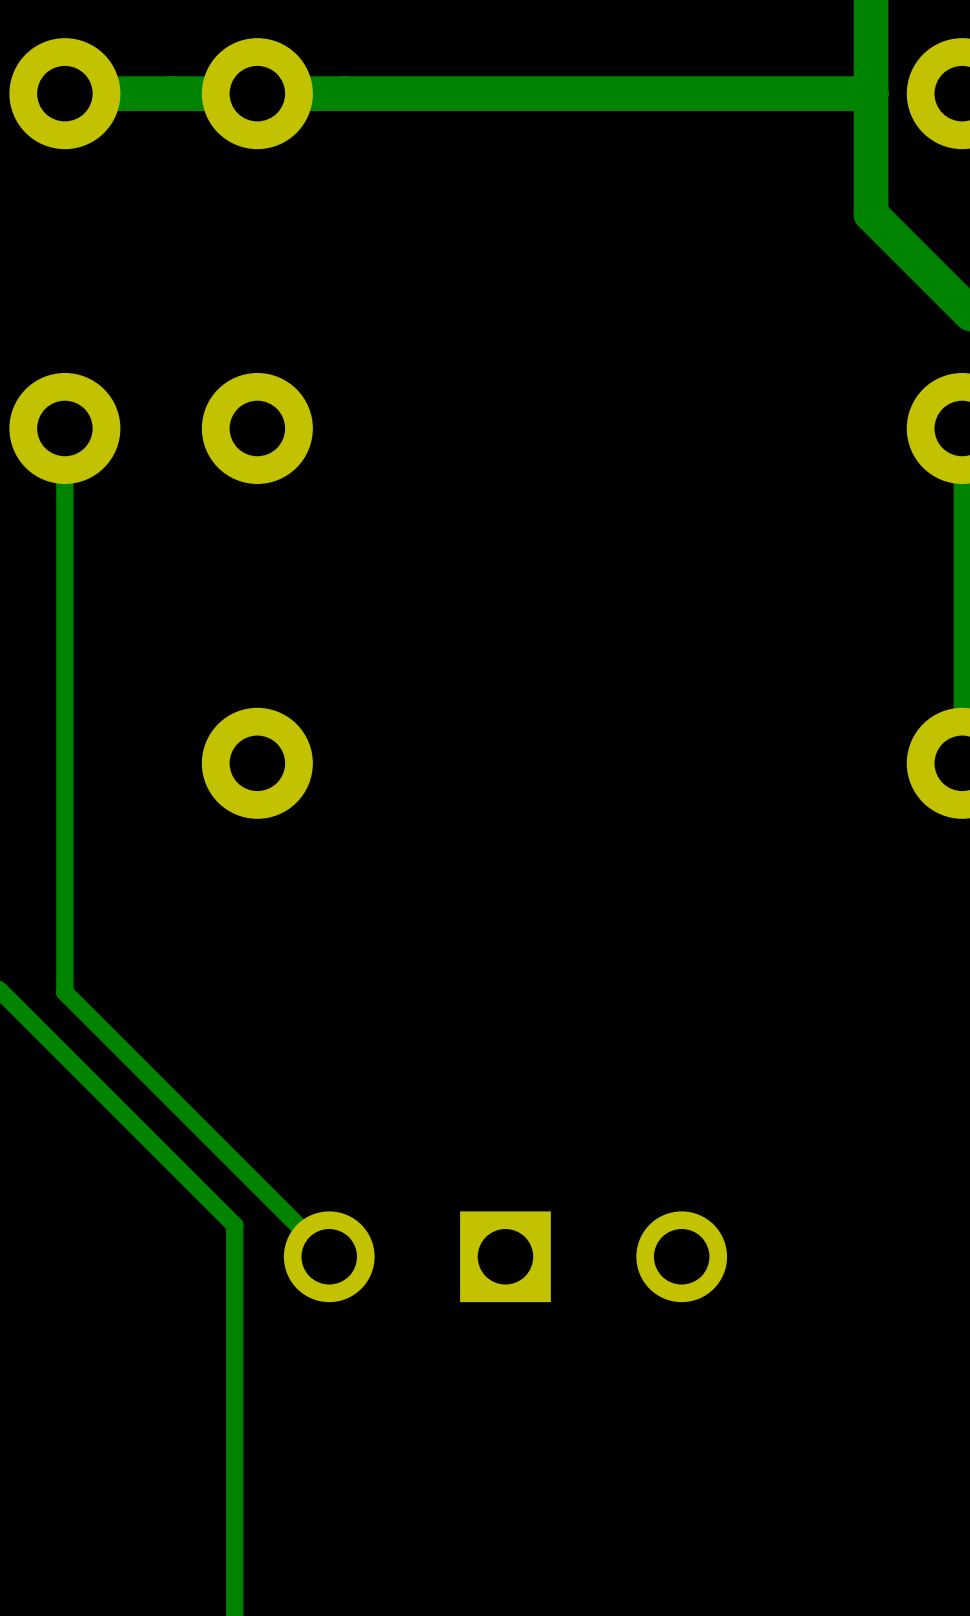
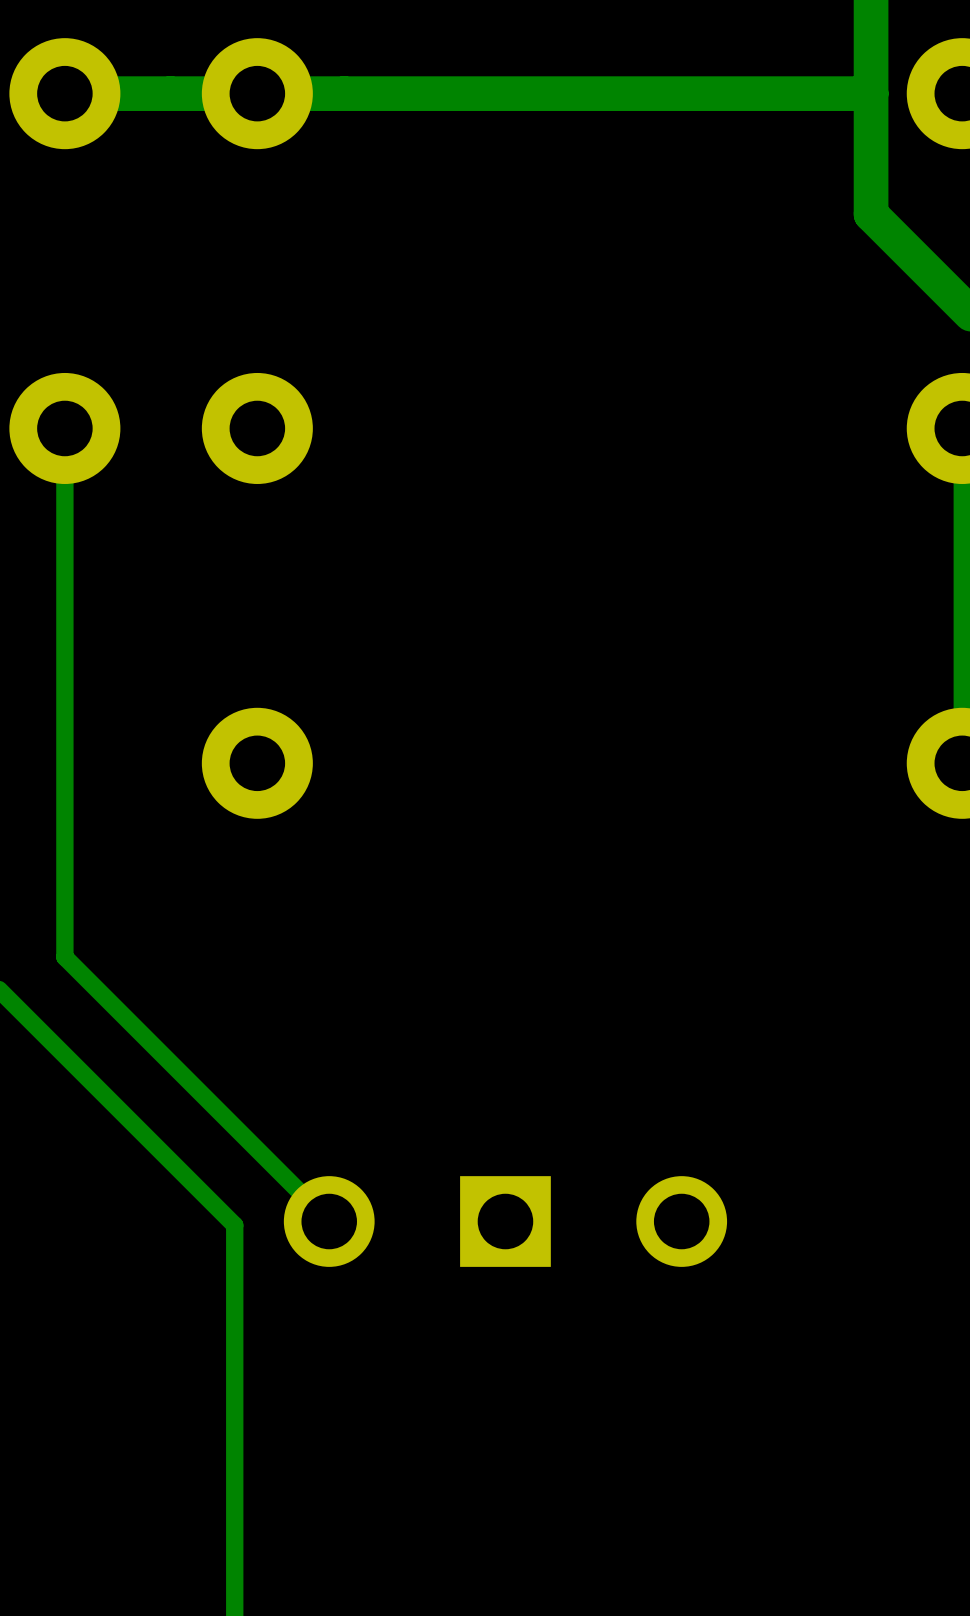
track: (64, 957) (64, 992) (329, 1256) -> (64, 957) (329, 1221)
part position: (505, 1256) -> (505, 1221)

